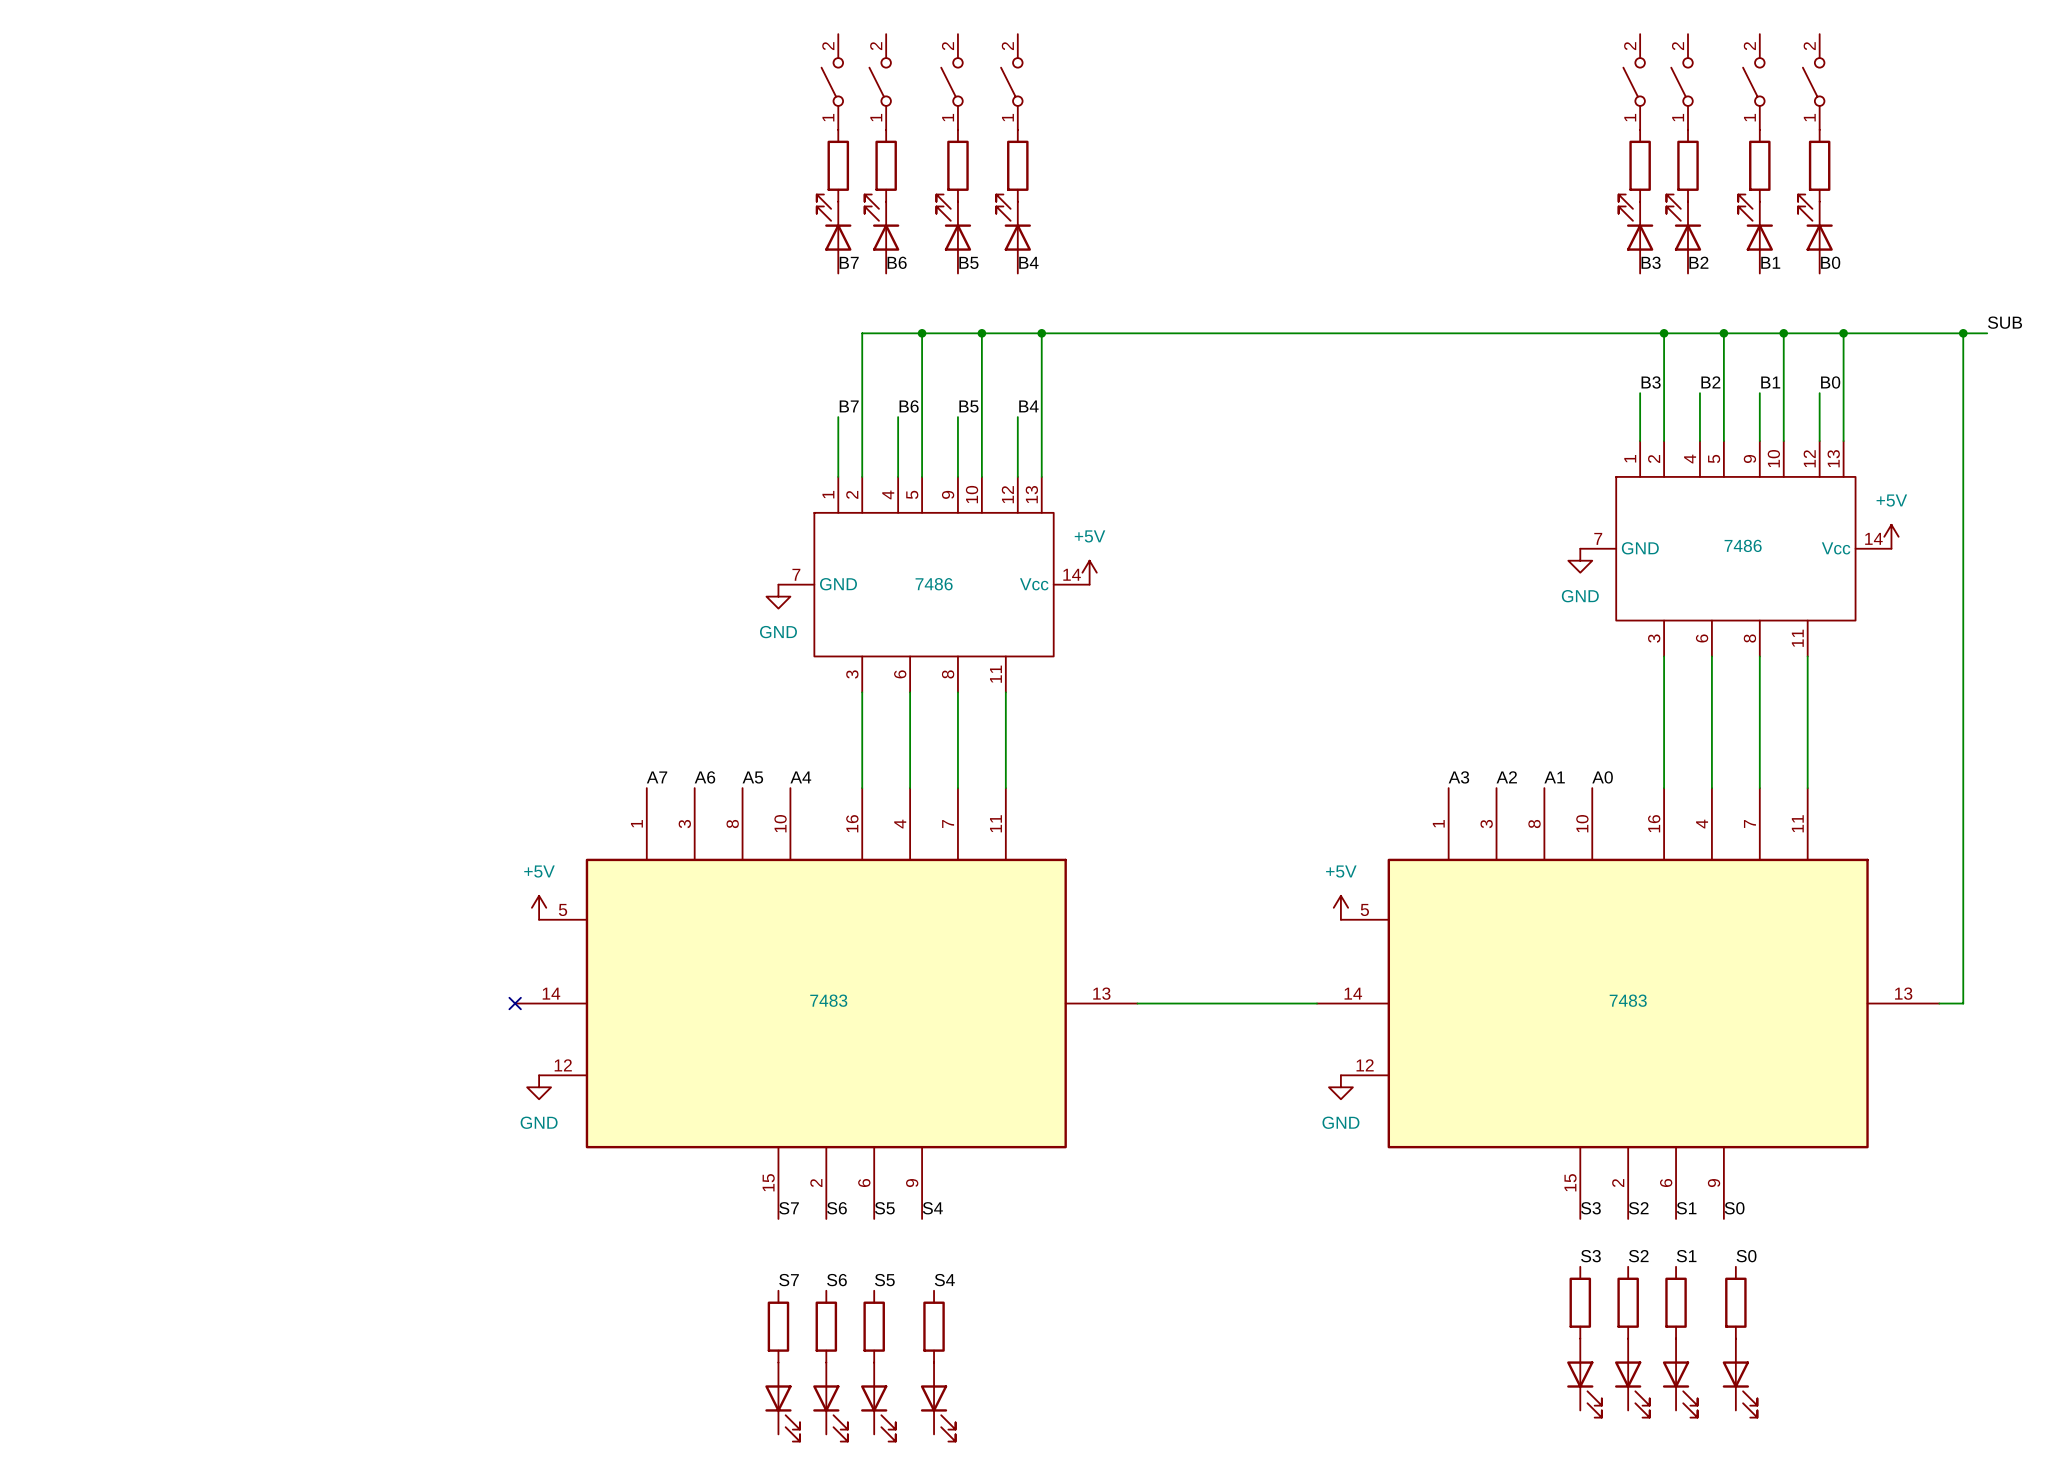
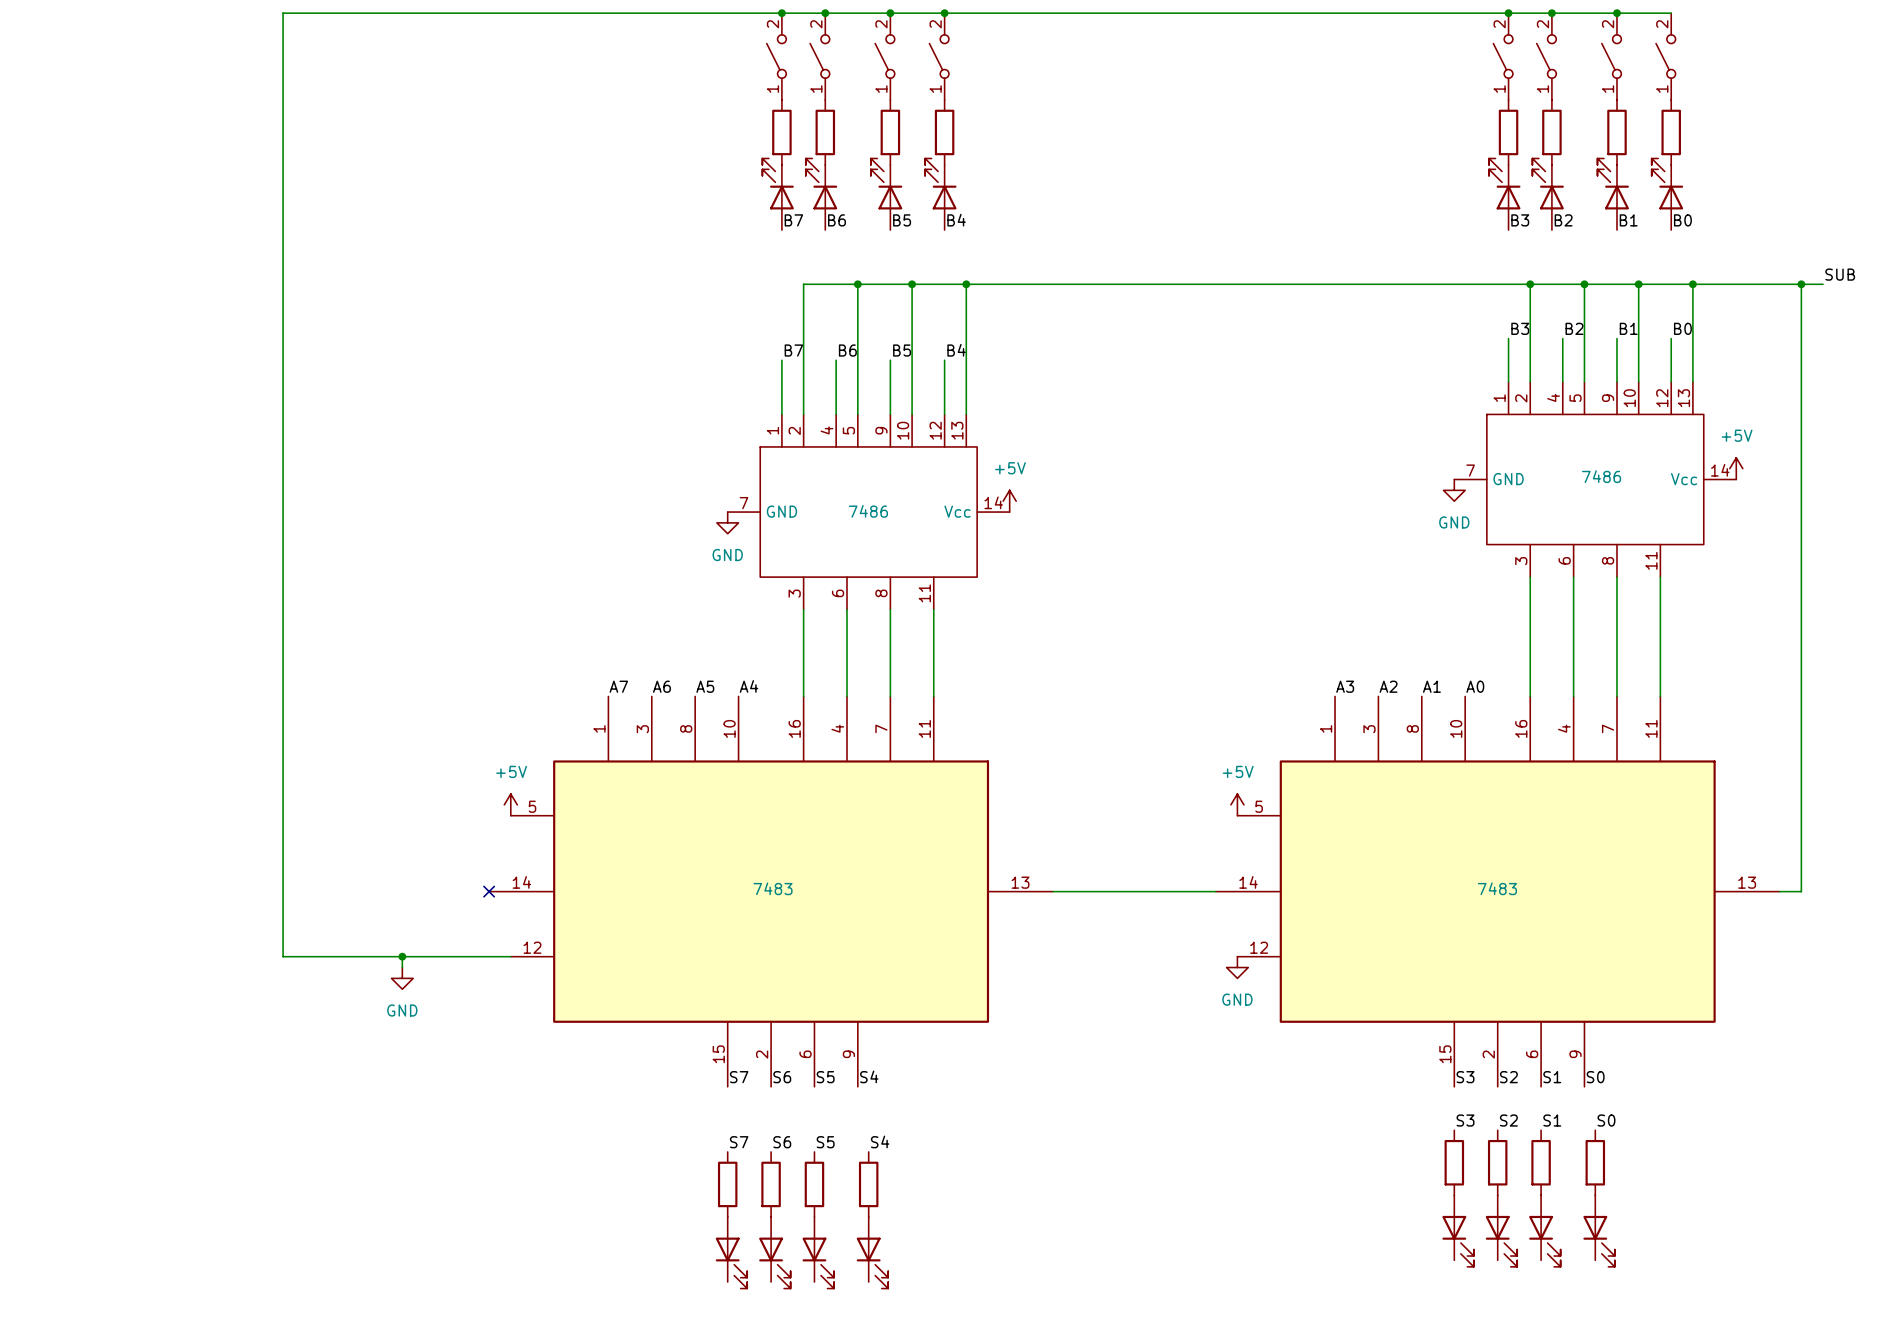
junction: none -> (781, 13)
junction: none -> (825, 13)
junction: none -> (890, 13)
junction: none -> (944, 13)
junction: none -> (1508, 13)
junction: none -> (1551, 13)
junction: none -> (1617, 13)
wire: none -> (1671, 13) (283, 13) (283, 956) (510, 956)
wire: none -> (402, 956) (402, 967)
junction: none -> (402, 956)
power symbol position: GND (539, 1087) -> GND (402, 978)

